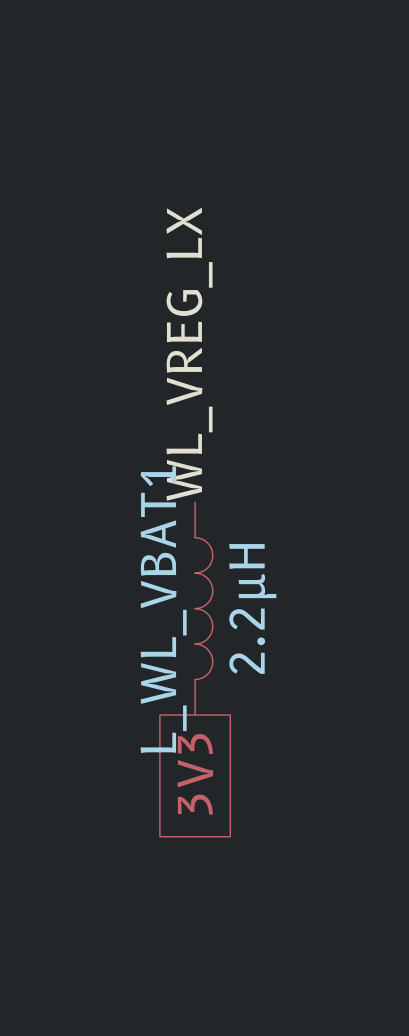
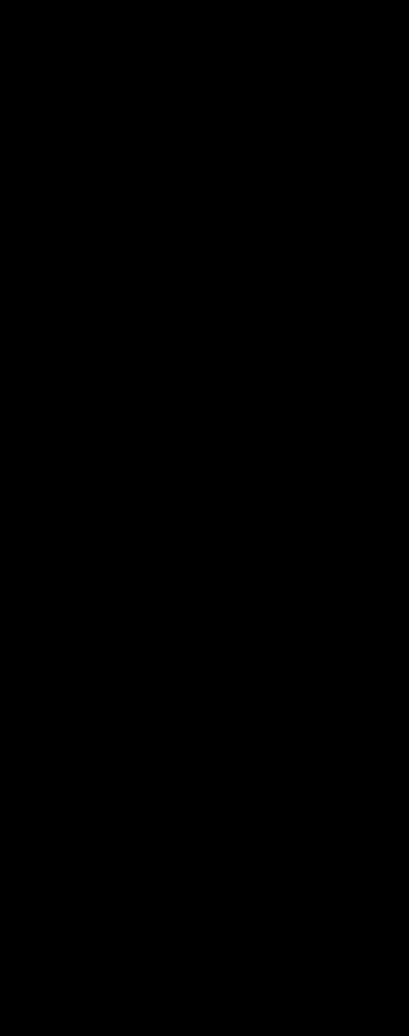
label: WL_VREG_LX (189, 354) -> none
L_WL_VBAT1: 2.2µH (203, 608) -> none
global label: 3V3 (195, 774) -> none

